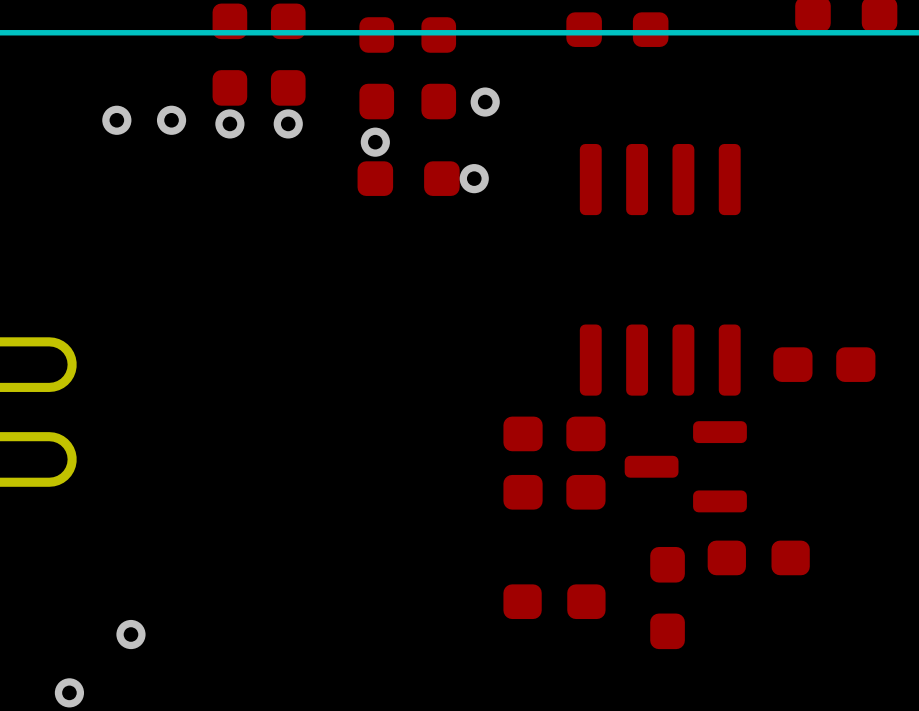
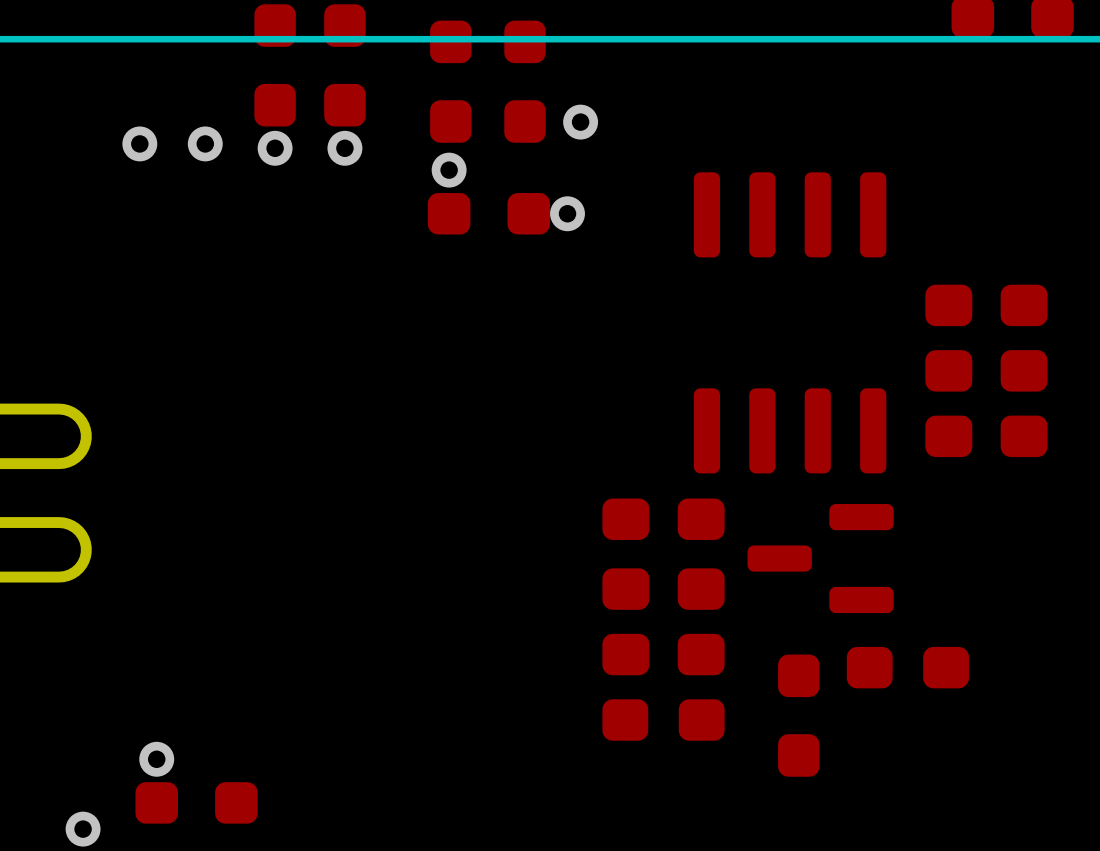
part position: (617, 29) -> (196, 802)
part: none -> (986, 305)
part: none -> (986, 370)
part: none -> (663, 654)

